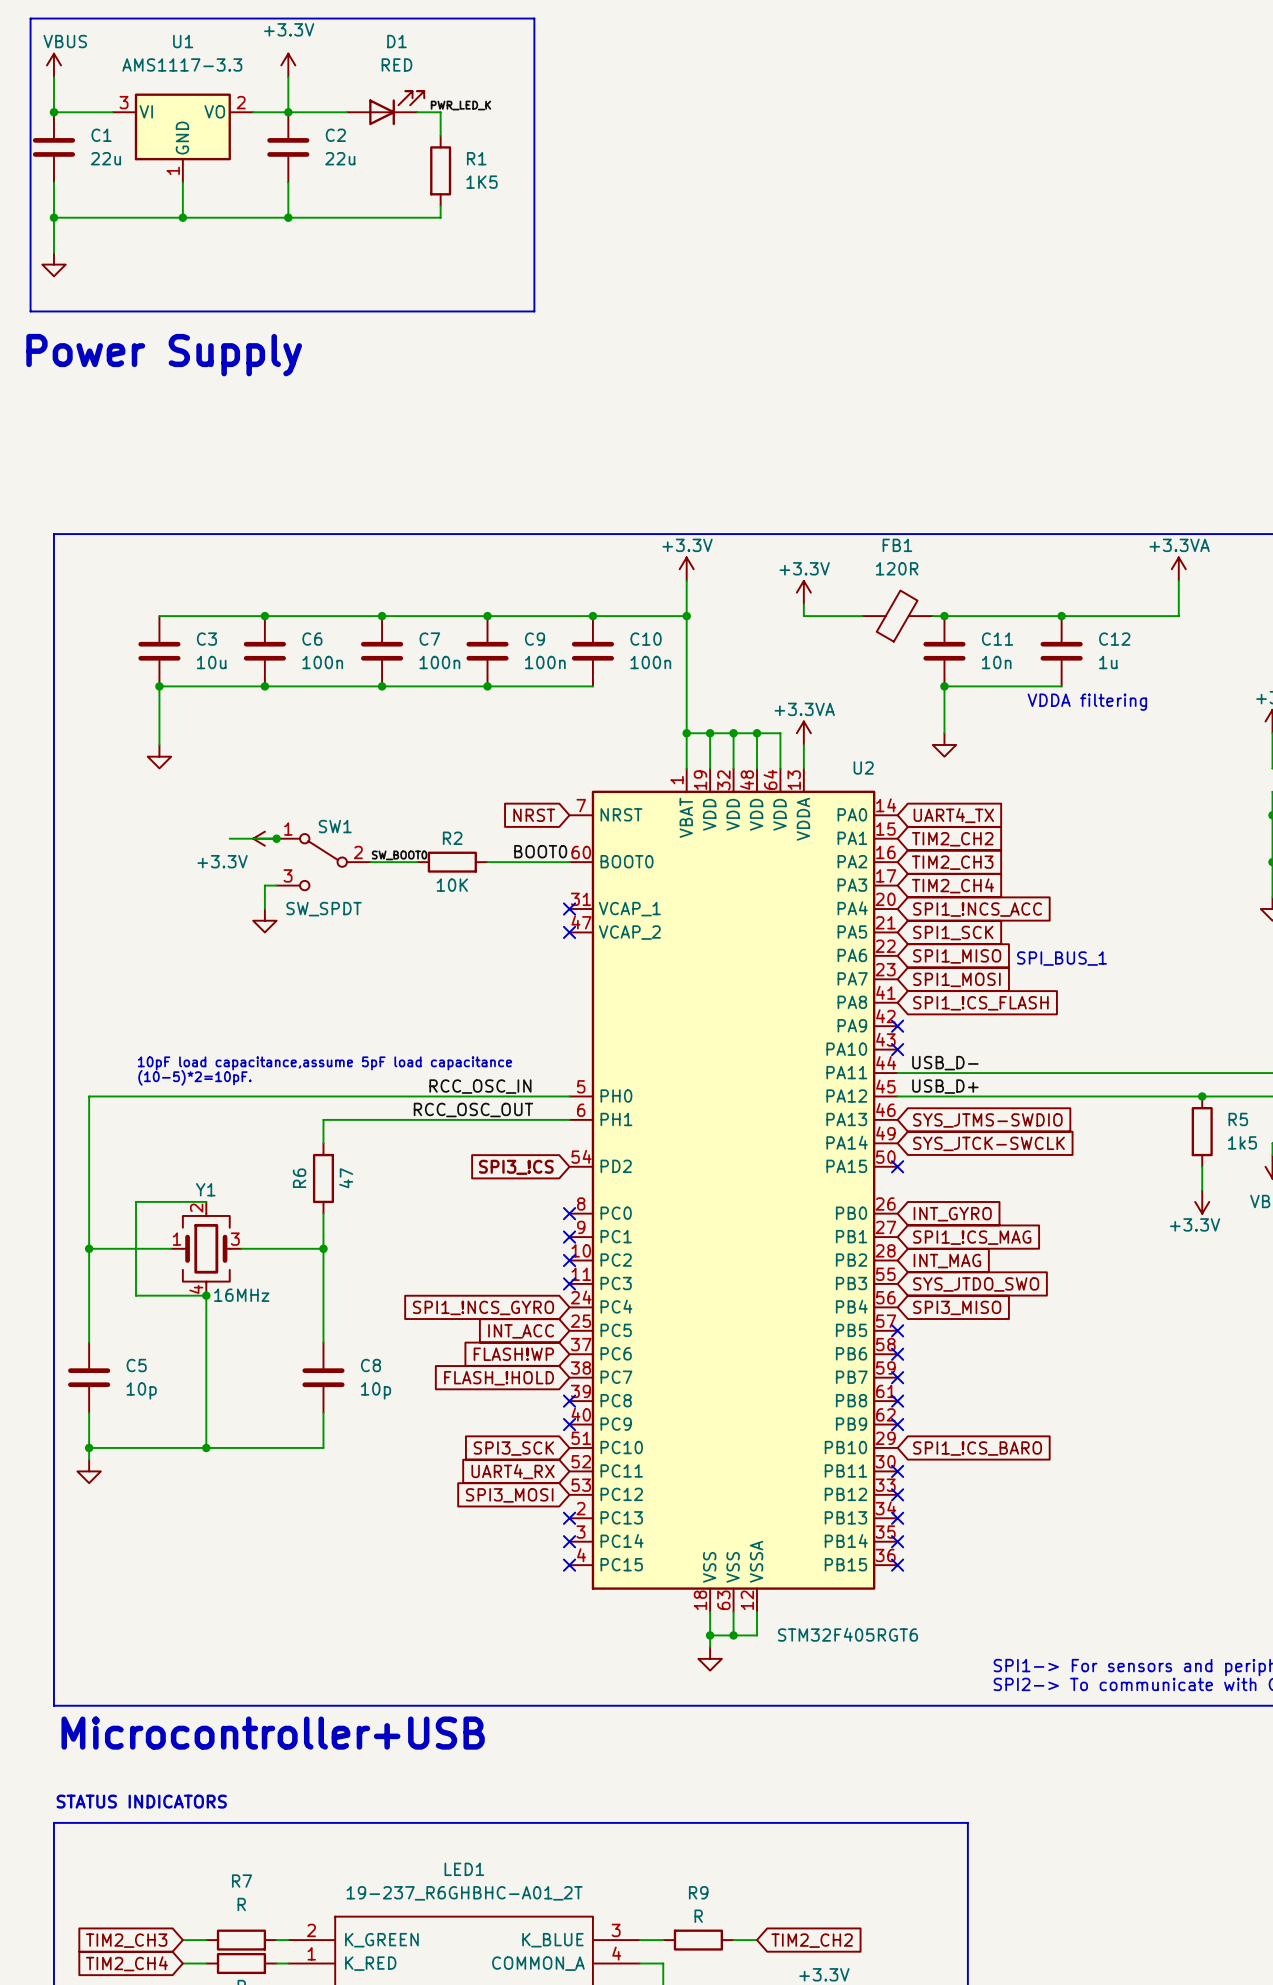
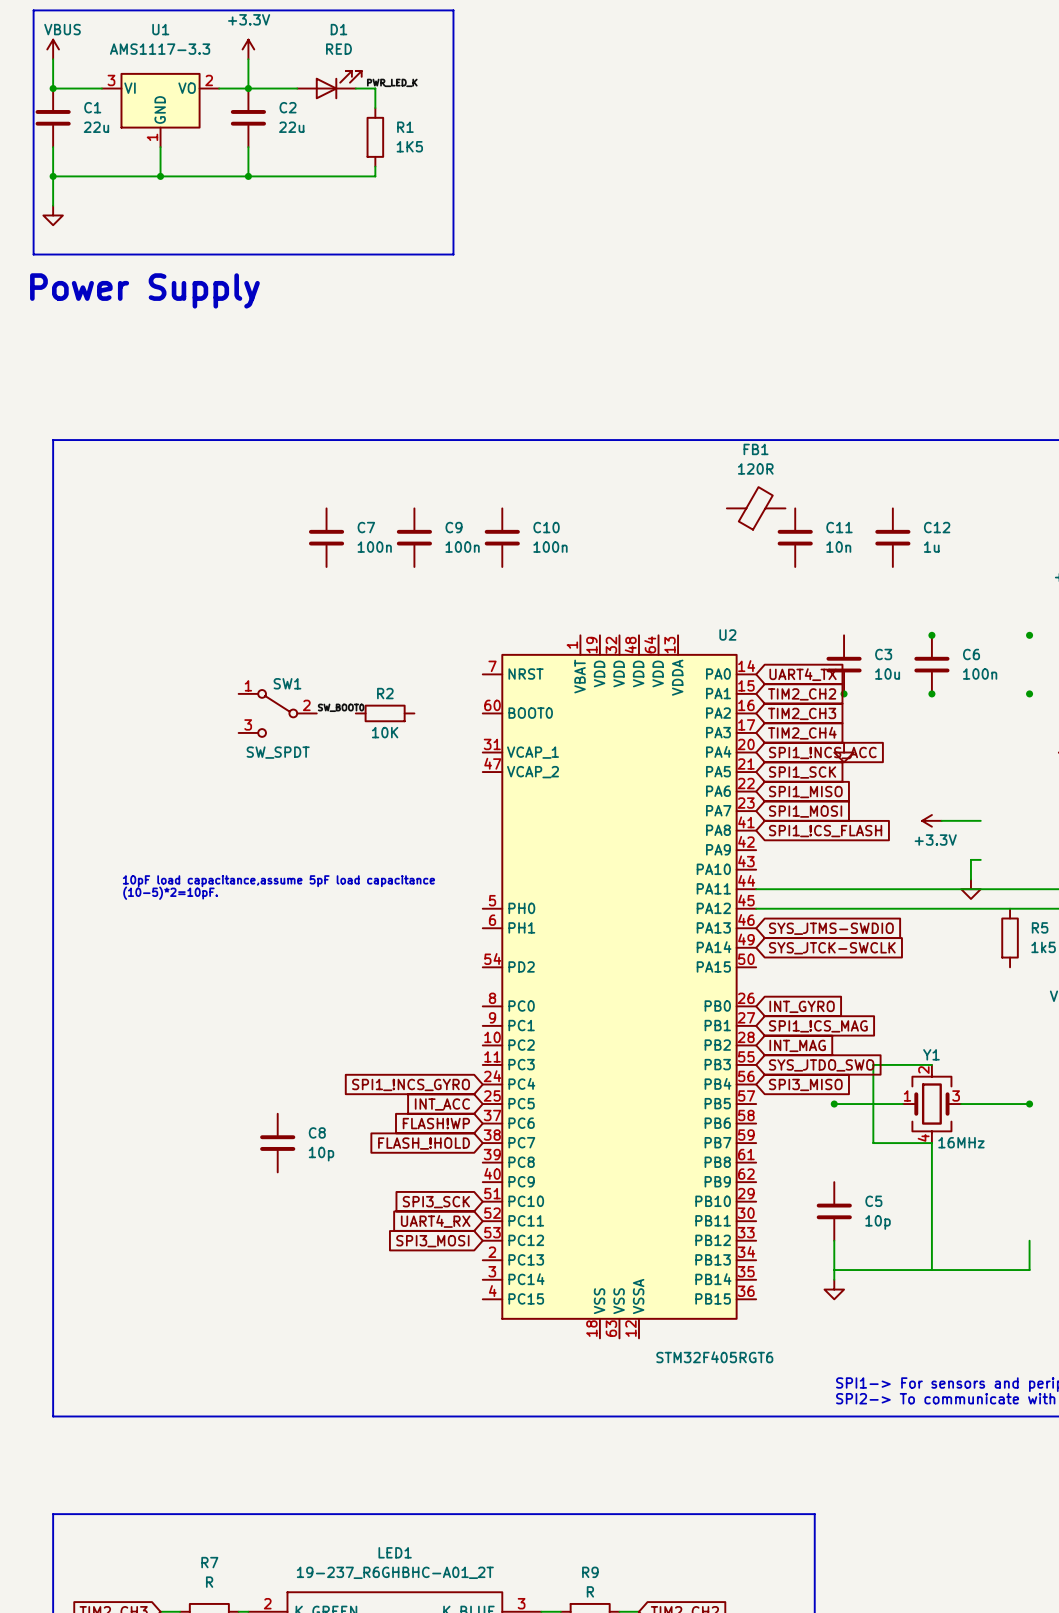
power symbol: +3.3V (686, 569) -> none
power symbol: +3.3VA (1178, 569) -> none
wire: (686, 580) (686, 768) -> none
wire: (1178, 580) (1178, 616) (932, 616) -> none
power symbol: +3.3V (803, 592) -> none
wire: (803, 604) (803, 616) (862, 616) -> none
wire: (159, 616) (686, 616) -> none
junction: (264, 616) -> none
junction: (382, 616) -> none
junction: (487, 616) -> none
junction: (592, 616) -> none
junction: (686, 616) -> none
junction: (944, 616) -> none
junction: (1061, 616) -> none
C3 position: (159, 651) -> (844, 664)
C6 position: (264, 651) -> (931, 664)
junction: (159, 686) -> none
junction: (264, 686) -> none
junction: (382, 686) -> none
junction: (487, 686) -> none
wire: (592, 686) (159, 686) (159, 744) -> none
junction: (944, 686) -> none
wire: (1061, 686) (944, 686) (944, 733) -> none
text: VDDA filtering (1087, 702) -> none
wire: (686, 733) (780, 733) (780, 768) -> none
junction: (686, 733) -> none
wire: (710, 733) (710, 768) -> none
junction: (710, 733) -> none
wire: (733, 733) (733, 768) -> none
junction: (733, 733) -> none
wire: (756, 733) (756, 768) -> none
junction: (756, 733) -> none
power symbol: +3.3VA (803, 733) -> none
wire: (803, 744) (803, 768) -> none
power symbol position: (944, 744) -> (844, 752)
power symbol: (159, 756) -> none
junction: none -> (931, 635)
junction: none -> (1029, 635)
global label: NRST (534, 815) -> none
wire: (229, 838) (276, 838) -> none
power symbol: +3.3V (264, 838) -> none
junction: (276, 838) -> none
junction: none -> (844, 693)
junction: none -> (931, 693)
junction: none -> (1029, 693)
label: BOOT0 (540, 851) -> none
wire: (370, 862) (417, 862) -> none
wire: (487, 862) (569, 862) -> none
wire: (276, 885) (264, 885) (264, 909) -> none
no-connect mark: (569, 909) -> none
power symbol: (264, 920) -> none
no-connect mark: (569, 932) -> none
text: SPI_BUS_1 (1061, 958) -> none
power symbol: none -> +3.3V (931, 820)
wire: none -> (941, 820) (980, 820)
no-connect mark: (897, 1026) -> none
wire: none -> (980, 859) (970, 859) (970, 879)
no-connect mark: (897, 1049) -> none
label: USB_D- (945, 1063) -> none
power symbol: none -> (970, 889)
label: RCC_OSC_IN (480, 1086) -> none
label: USB_D+ (945, 1086) -> none
wire: (569, 1096) (89, 1096) (89, 1342) -> none
junction: (1202, 1096) -> none
label: RCC_OSC_OUT (473, 1110) -> none
wire: (569, 1119) (323, 1119) (323, 1143) -> none
no-connect mark: (897, 1166) -> none
wire: (1202, 1166) (1202, 1190) -> none
global label: SPI3_!CS (516, 1167) -> none
R6: 47 (323, 1178) -> none
wire: (206, 1201) (136, 1201) (136, 1295) (206, 1295) (206, 1447) -> none
power symbol: +3.3V (1202, 1201) -> none
wire: (323, 1213) (323, 1342) -> none
no-connect mark: (569, 1213) -> none
no-connect mark: (569, 1237) -> none
wire: (89, 1248) (171, 1248) -> none
junction: (89, 1248) -> none
Y1 position: (206, 1248) -> (931, 1104)
wire: (241, 1248) (323, 1248) -> none
junction: (323, 1248) -> none
no-connect mark: (569, 1260) -> none
no-connect mark: (569, 1283) -> none
wire: none -> (931, 1064) (873, 1064) (873, 1143) (931, 1143) (931, 1270)
junction: (206, 1295) -> none
no-connect mark: (897, 1330) -> none
wire: none -> (834, 1104) (902, 1104)
junction: none -> (834, 1104)
wire: none -> (961, 1104) (1029, 1104)
junction: none -> (1029, 1104)
no-connect mark: (897, 1354) -> none
C5 position: (89, 1377) -> (834, 1211)
no-connect mark: (897, 1377) -> none
no-connect mark: (569, 1401) -> none
no-connect mark: (897, 1401) -> none
wire: (89, 1412) (89, 1459) -> none
wire: (323, 1412) (323, 1447) (89, 1447) -> none
no-connect mark: (569, 1424) -> none
no-connect mark: (897, 1424) -> none
junction: (89, 1447) -> none
junction: (206, 1447) -> none
global label: SPI1_!CS_BARO (977, 1448) -> none
power symbol: (89, 1471) -> none
no-connect mark: (897, 1471) -> none
no-connect mark: (897, 1494) -> none
wire: none -> (834, 1240) (834, 1279)
wire: none -> (1029, 1240) (1029, 1270) (834, 1270)
no-connect mark: (569, 1518) -> none
no-connect mark: (897, 1518) -> none
no-connect mark: (569, 1541) -> none
no-connect mark: (897, 1541) -> none
power symbol: none -> (834, 1289)
no-connect mark: (569, 1565) -> none
no-connect mark: (897, 1565) -> none
wire: (710, 1612) (710, 1647) -> none
wire: (733, 1612) (733, 1635) -> none
wire: (756, 1612) (756, 1635) (710, 1635) -> none
junction: (710, 1635) -> none
junction: (733, 1635) -> none
power symbol: (710, 1658) -> none
text: Microcontroller+USB (273, 1733) -> none
text: STATUS INDICATORS (141, 1801) -> none

